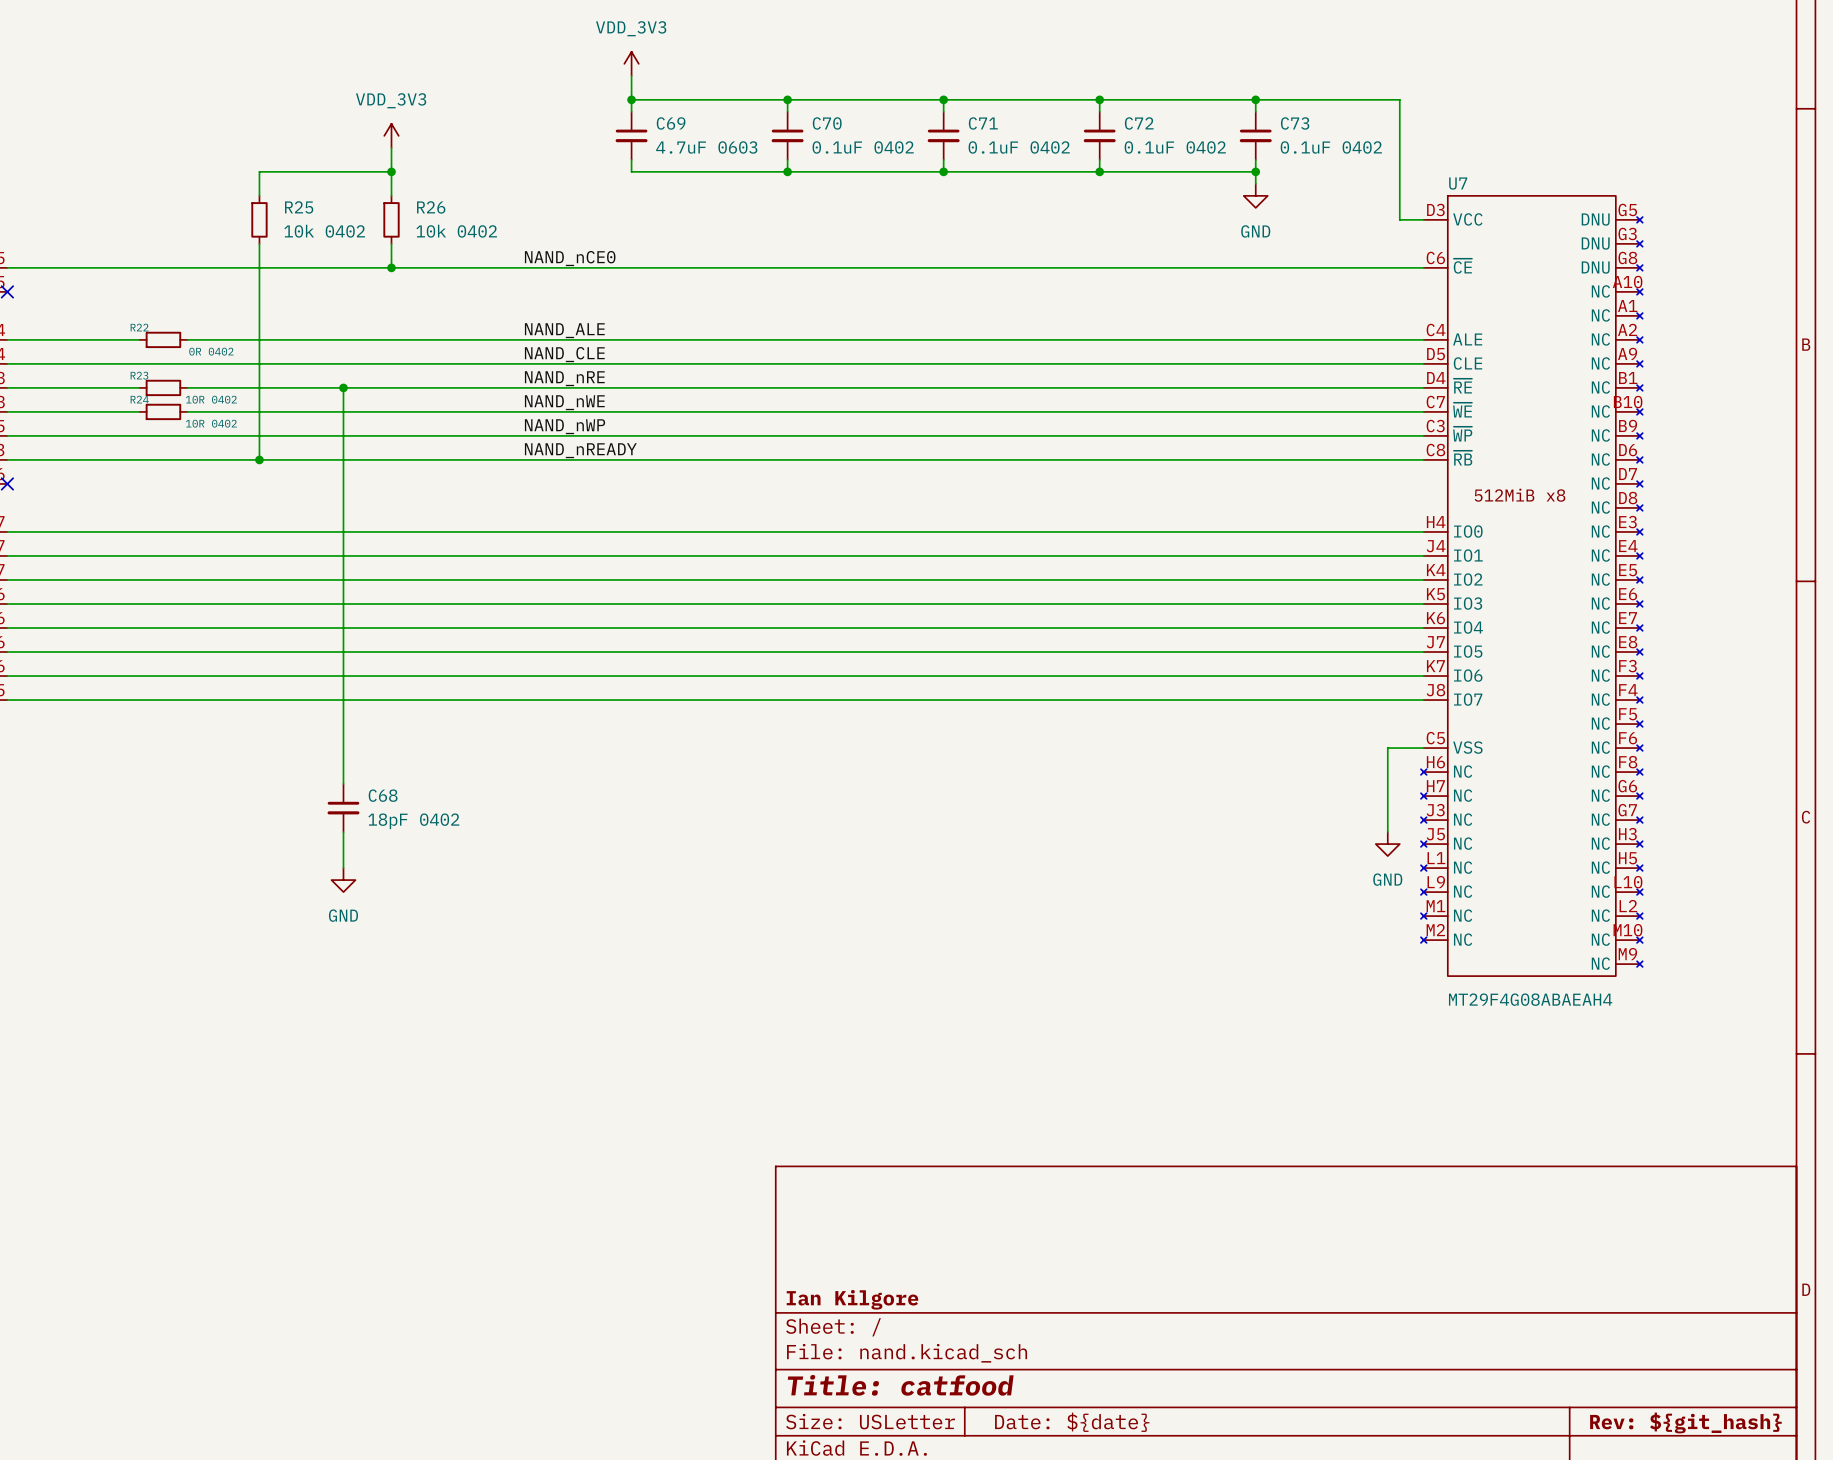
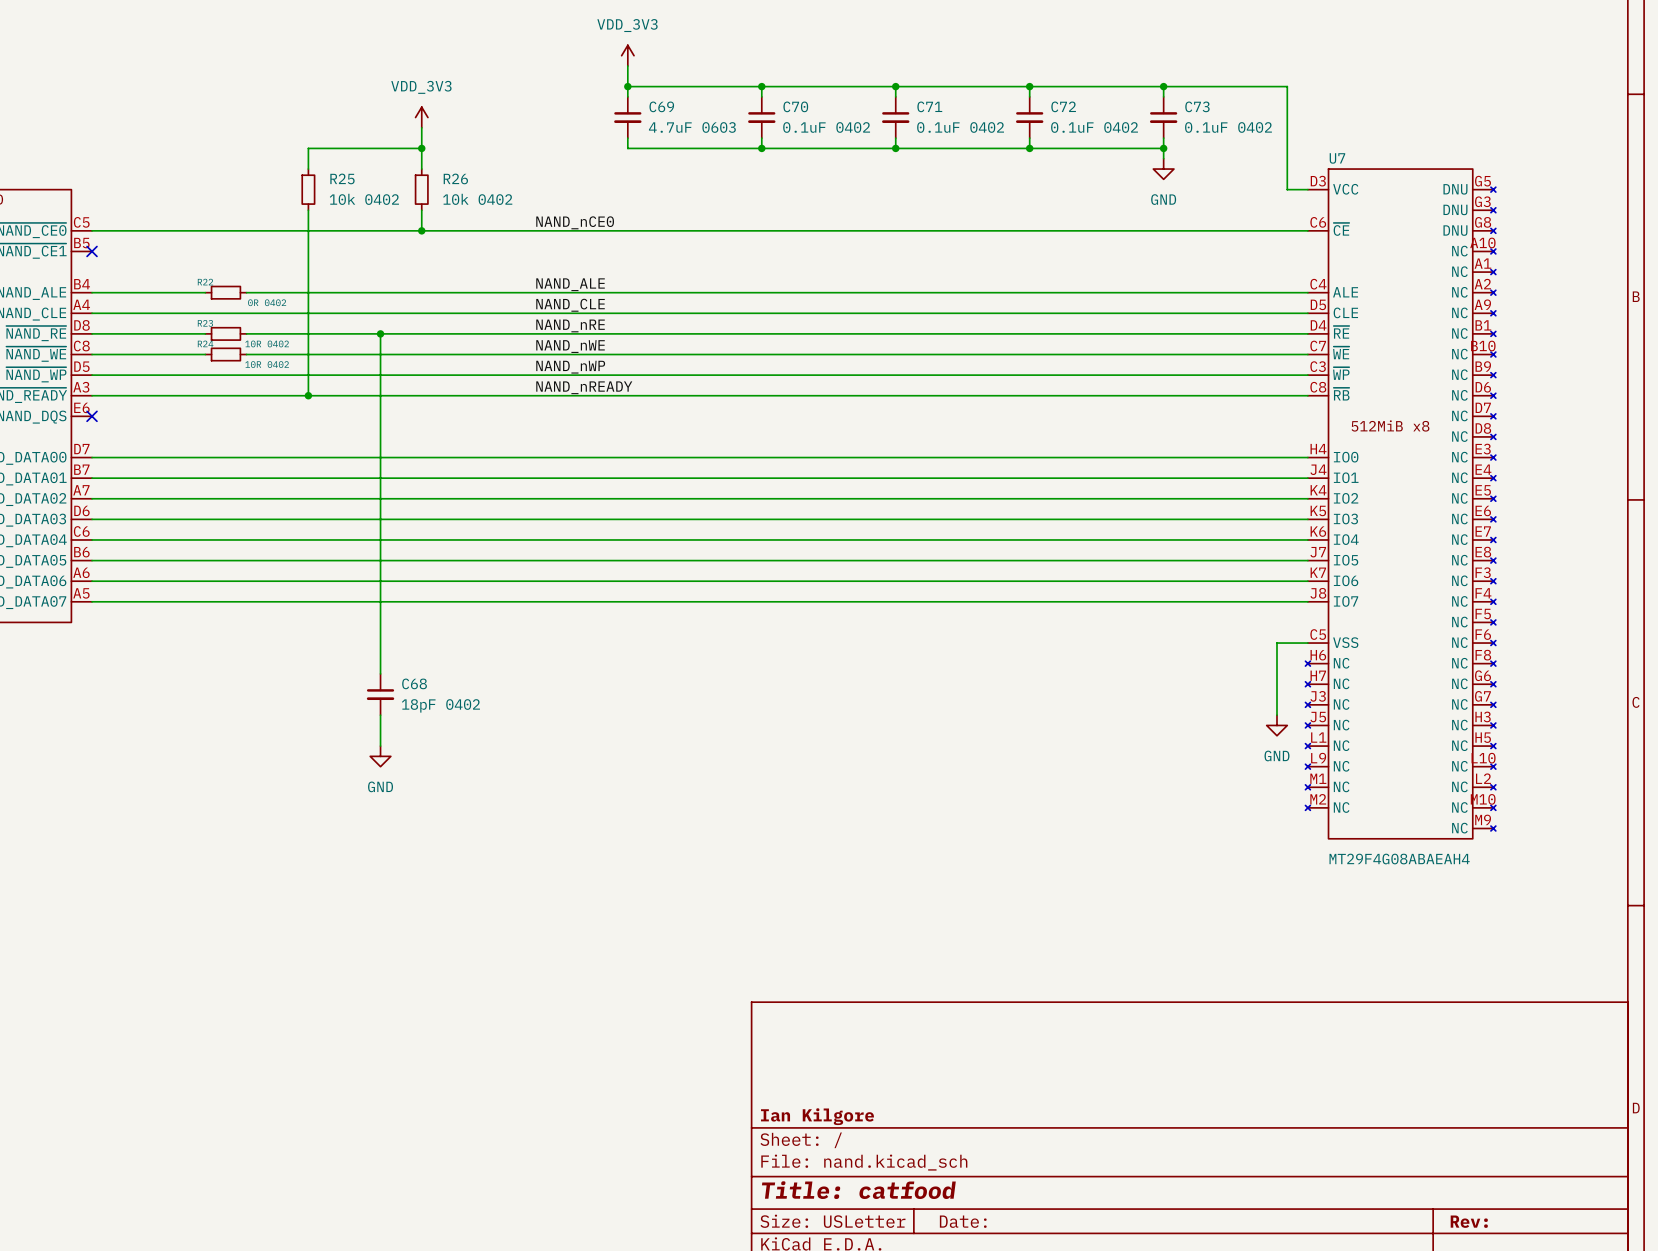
title block: Date: ${date} (1072, 1422) -> Date: (963, 1221)
title block: Rev: ${git_hash} (1685, 1423) -> Rev: (1469, 1221)

